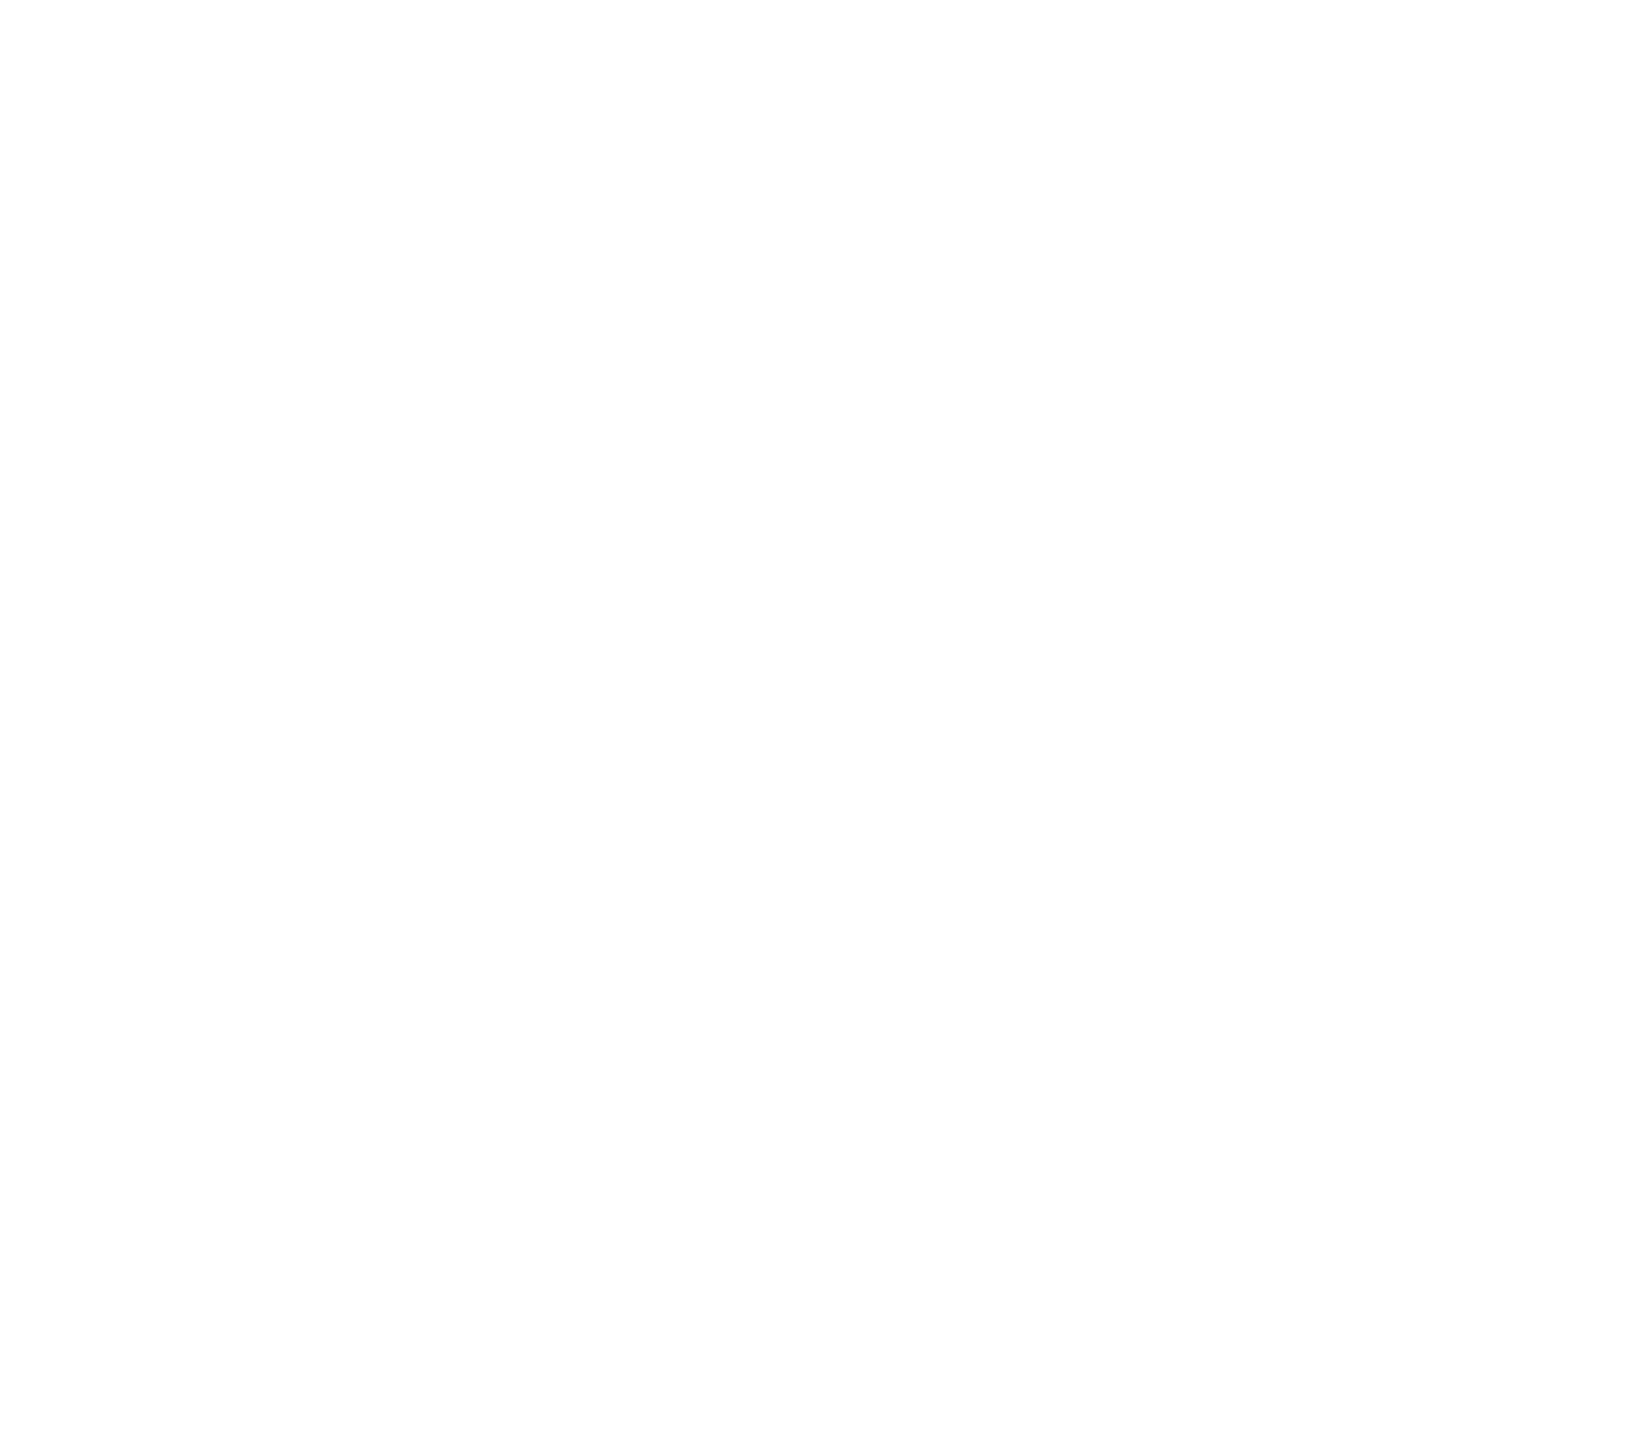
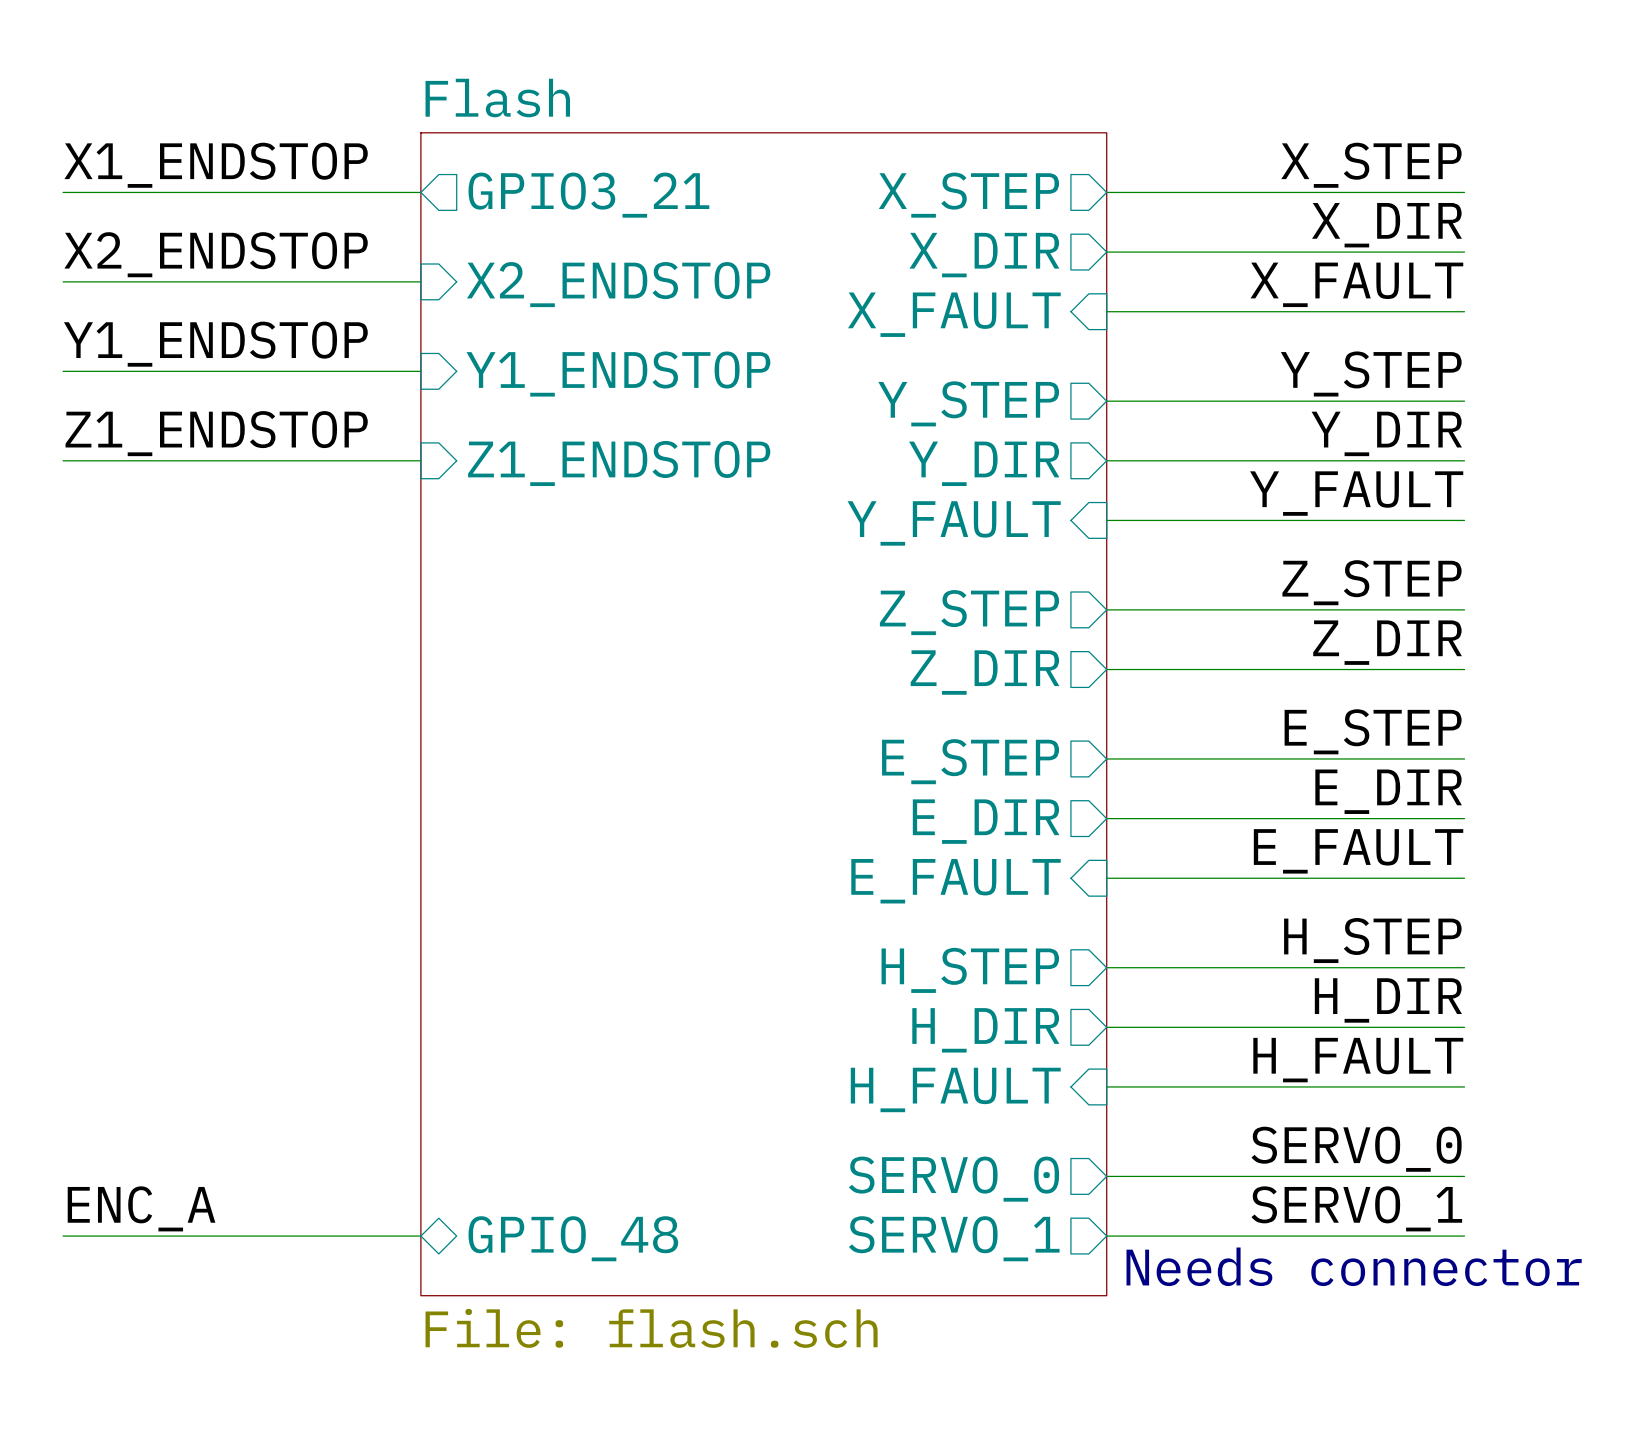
label: none -> X1_ENDSTOP (216, 165)
label: none -> X_STEP (1371, 165)
wire: none -> (63, 192) (420, 192)
wire: none -> (1106, 192) (1464, 192)
sheet pin: none -> GPIO3_21 (588, 195)
sheet pin: none -> X_STEP (968, 195)
label: none -> X_DIR (1386, 225)
wire: none -> (1106, 252) (1464, 252)
label: none -> X2_ENDSTOP (216, 254)
sheet pin: none -> X_DIR (984, 255)
wire: none -> (63, 281) (420, 281)
sheet pin: none -> X2_ENDSTOP (618, 284)
label: none -> X_FAULT (1356, 284)
wire: none -> (1106, 311) (1464, 311)
sheet pin: none -> X_FAULT (954, 314)
label: none -> Y1_ENDSTOP (215, 344)
wire: none -> (63, 371) (420, 371)
label: none -> Y_STEP (1371, 373)
sheet pin: none -> Y1_ENDSTOP (618, 374)
wire: none -> (1106, 401) (1464, 401)
sheet pin: none -> Y_STEP (968, 403)
label: none -> Z1_ENDSTOP (216, 433)
label: none -> Y_DIR (1386, 433)
wire: none -> (63, 460) (420, 460)
wire: none -> (1106, 460) (1464, 460)
sheet pin: none -> Z1_ENDSTOP (619, 463)
sheet pin: none -> Y_DIR (984, 463)
label: none -> Y_FAULT (1356, 493)
wire: none -> (1106, 520) (1464, 520)
sheet pin: none -> Y_FAULT (954, 523)
label: none -> Z_STEP (1372, 582)
wire: none -> (1106, 609) (1464, 609)
sheet pin: none -> Z_STEP (969, 612)
label: none -> Z_DIR (1387, 642)
wire: none -> (1106, 669) (1464, 669)
sheet pin: none -> Z_DIR (985, 672)
sheet Flash: none -> File: flash.sch (763, 714)
label: none -> E_STEP (1373, 731)
wire: none -> (1106, 758) (1464, 758)
sheet pin: none -> E_STEP (970, 761)
label: none -> E_DIR (1388, 791)
wire: none -> (1106, 818) (1464, 818)
sheet pin: none -> E_DIR (986, 821)
label: none -> E_FAULT (1358, 851)
wire: none -> (1106, 878) (1464, 878)
sheet pin: none -> E_FAULT (956, 881)
label: none -> H_STEP (1372, 940)
wire: none -> (1106, 967) (1464, 967)
sheet pin: none -> H_STEP (970, 970)
label: none -> H_DIR (1388, 1000)
wire: none -> (1106, 1027) (1464, 1027)
sheet pin: none -> H_DIR (985, 1030)
label: none -> H_FAULT (1358, 1060)
wire: none -> (1106, 1086) (1464, 1086)
sheet pin: none -> H_FAULT (955, 1089)
label: none -> SERVO_0 (1356, 1149)
wire: none -> (1106, 1176) (1464, 1176)
sheet pin: none -> SERVO_0 (954, 1179)
label: none -> ENC_A (141, 1208)
label: none -> SERVO_1 (1356, 1208)
wire: none -> (63, 1236) (420, 1236)
wire: none -> (1106, 1236) (1464, 1236)
sheet pin: none -> GPIO_48 (573, 1238)
sheet pin: none -> SERVO_1 (954, 1238)
text: none -> Needs connector (1354, 1266)

